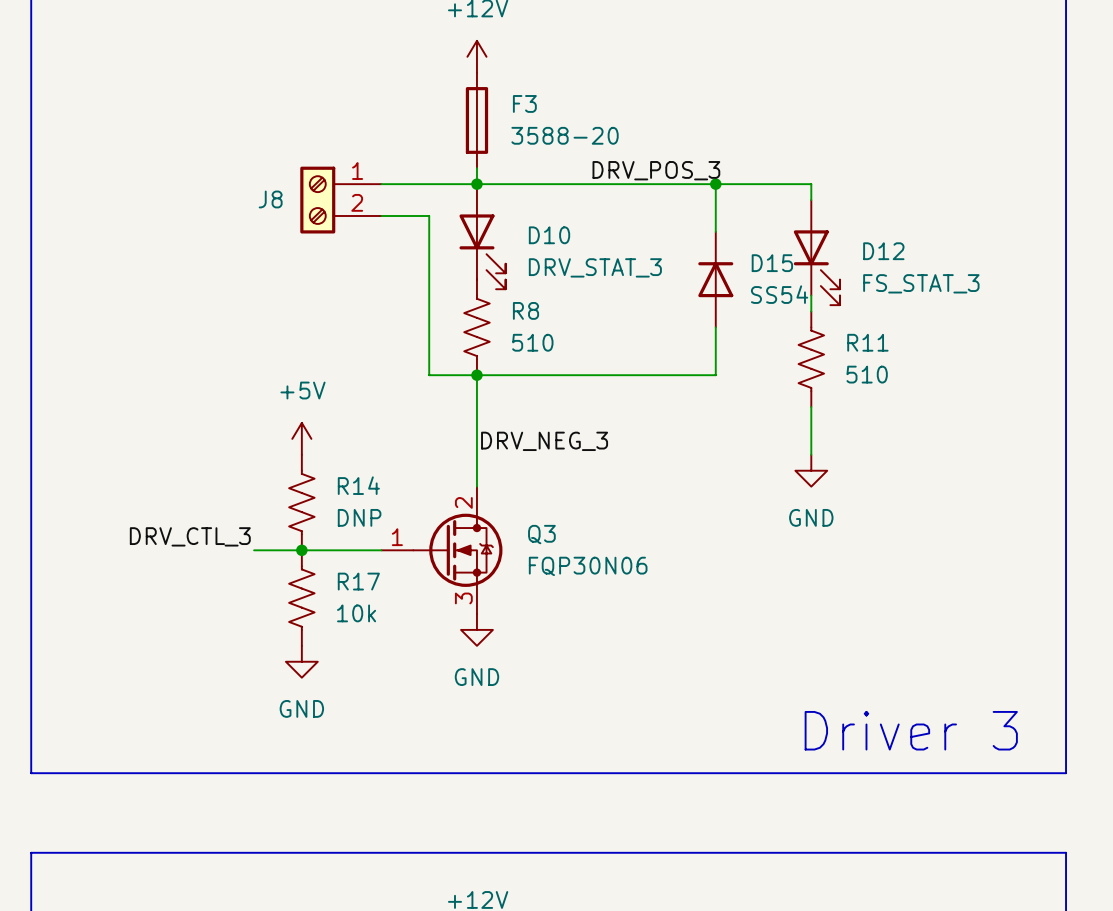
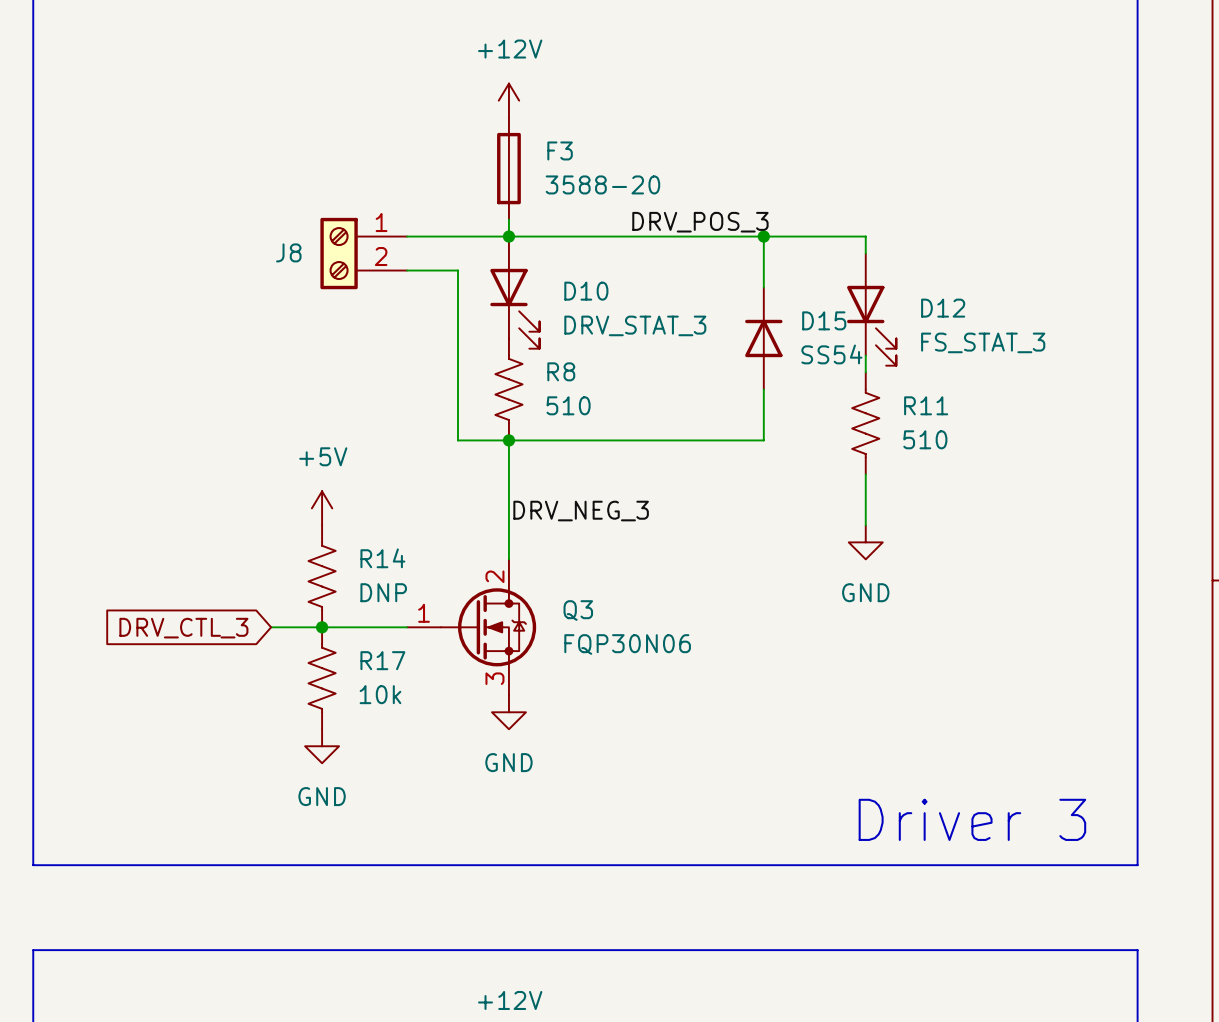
label: DRV_CTL_3 (190, 536) -> none
global label: none -> DRV_CTL_3 (183, 628)

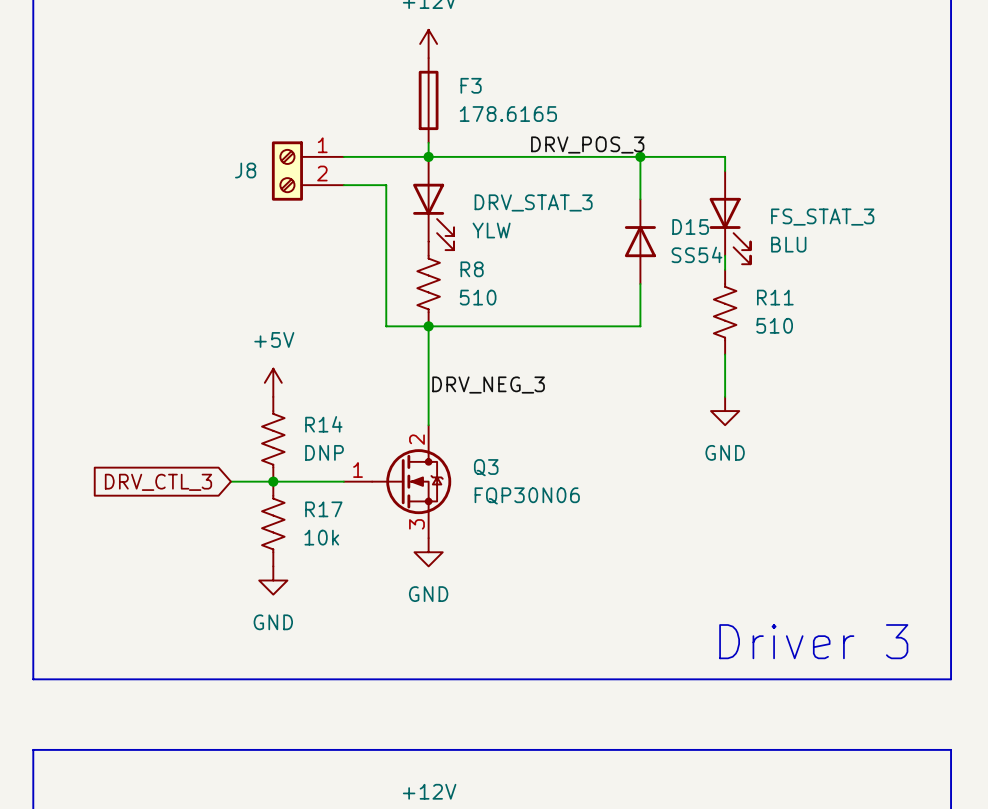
F3 value: 3588-20 (602, 184) -> 178.6165 (508, 114)
D10 name: D10 (586, 291) -> DRV_STAT_3 (533, 202)
D12 name: D12 (943, 308) -> FS_STAT_3 (822, 217)
D10 value: DRV_STAT_3 (635, 325) -> YLW (491, 230)
D12 value: FS_STAT_3 (983, 342) -> BLU (788, 244)

